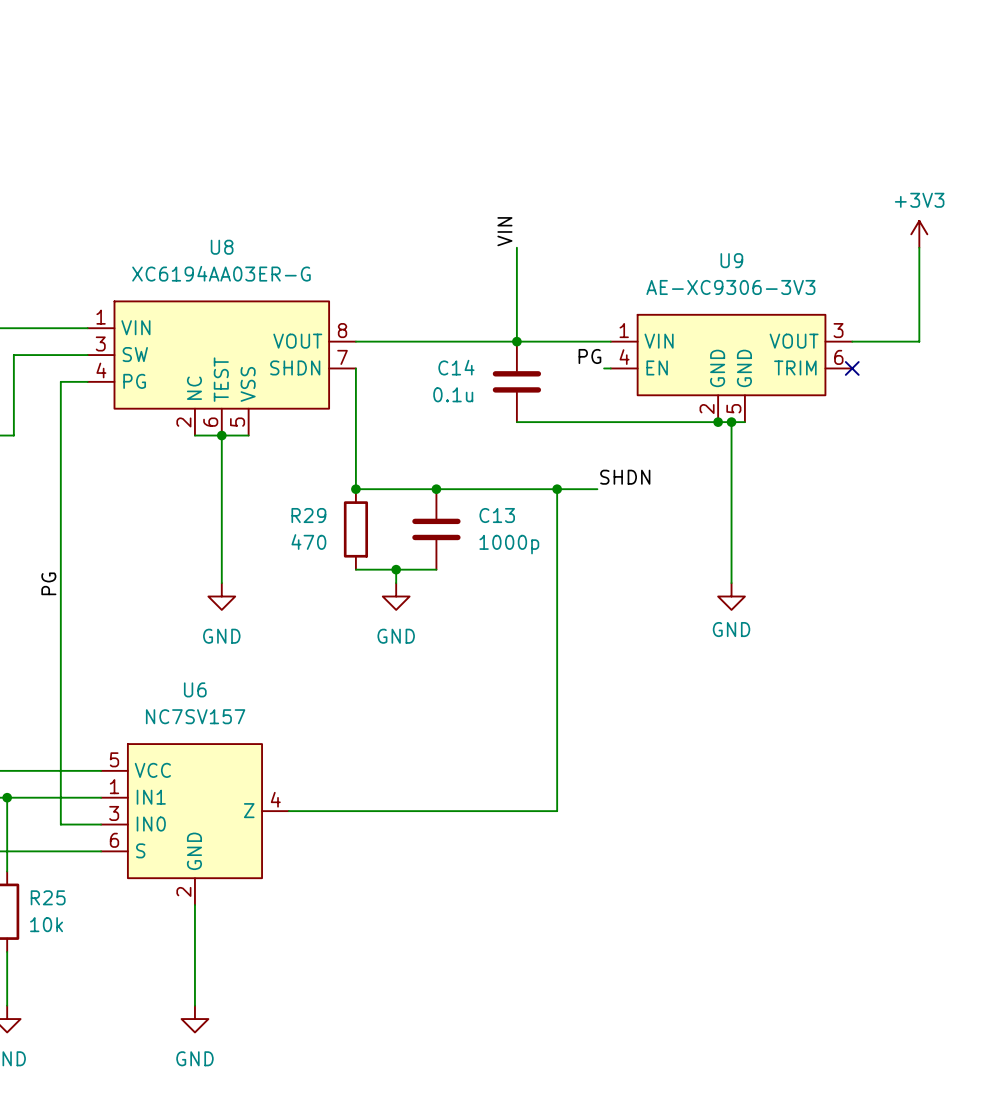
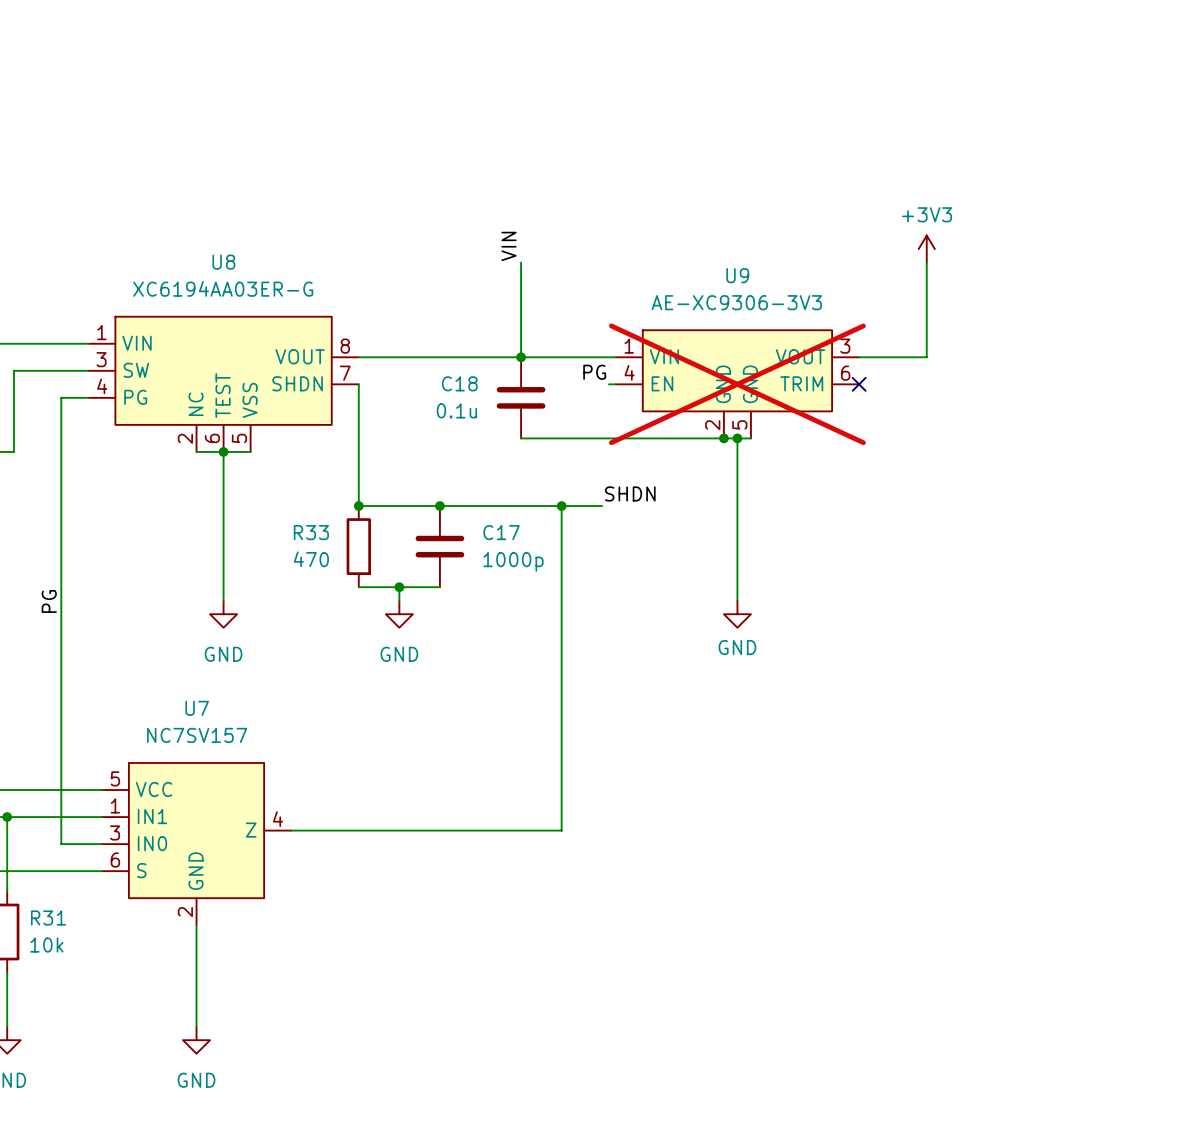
C14 name: C14 (456, 367) -> C18 (459, 383)
U9 do-not-place cross: none -> (737, 384)
R29 name: R29 (308, 515) -> R33 (311, 532)
C13 name: C13 (497, 515) -> C17 (501, 532)
U6 name: U6 (195, 689) -> U7 (197, 708)
R25 name: R25 (48, 897) -> R31 (48, 917)

